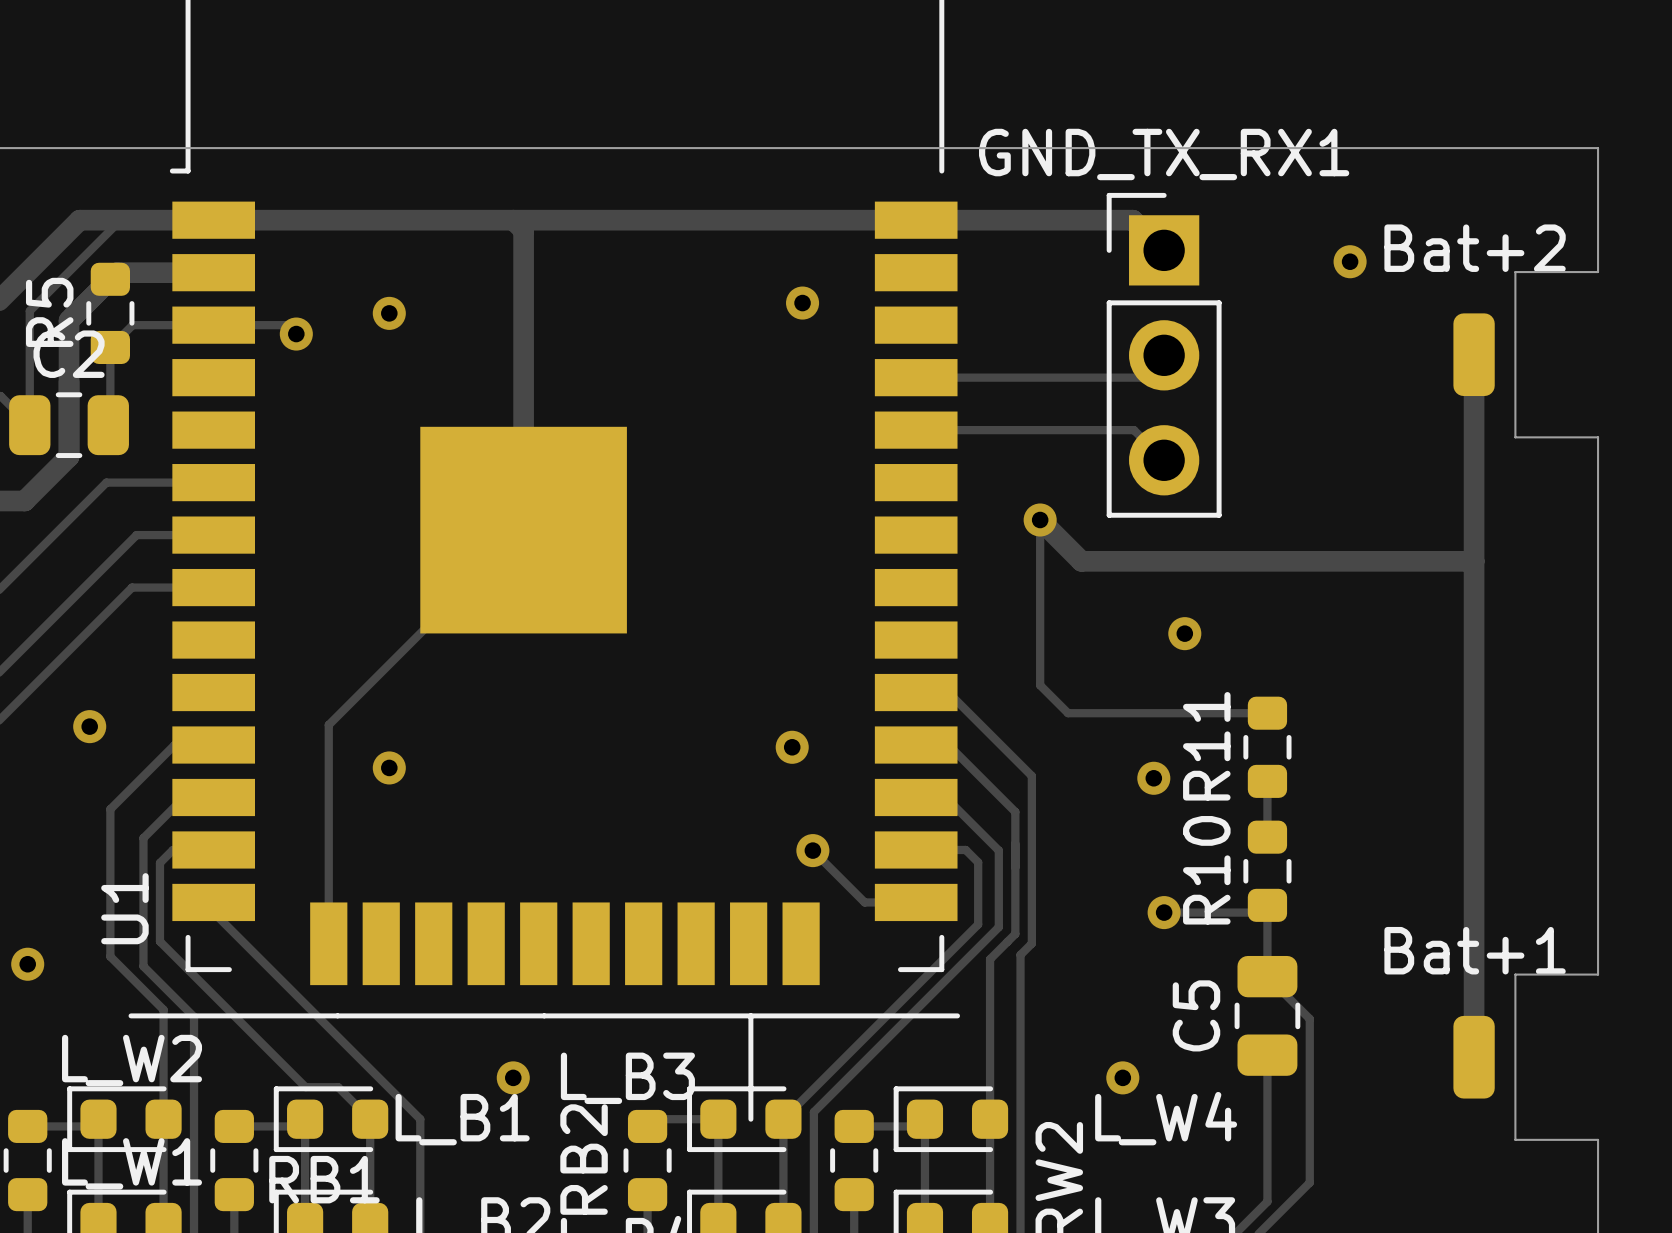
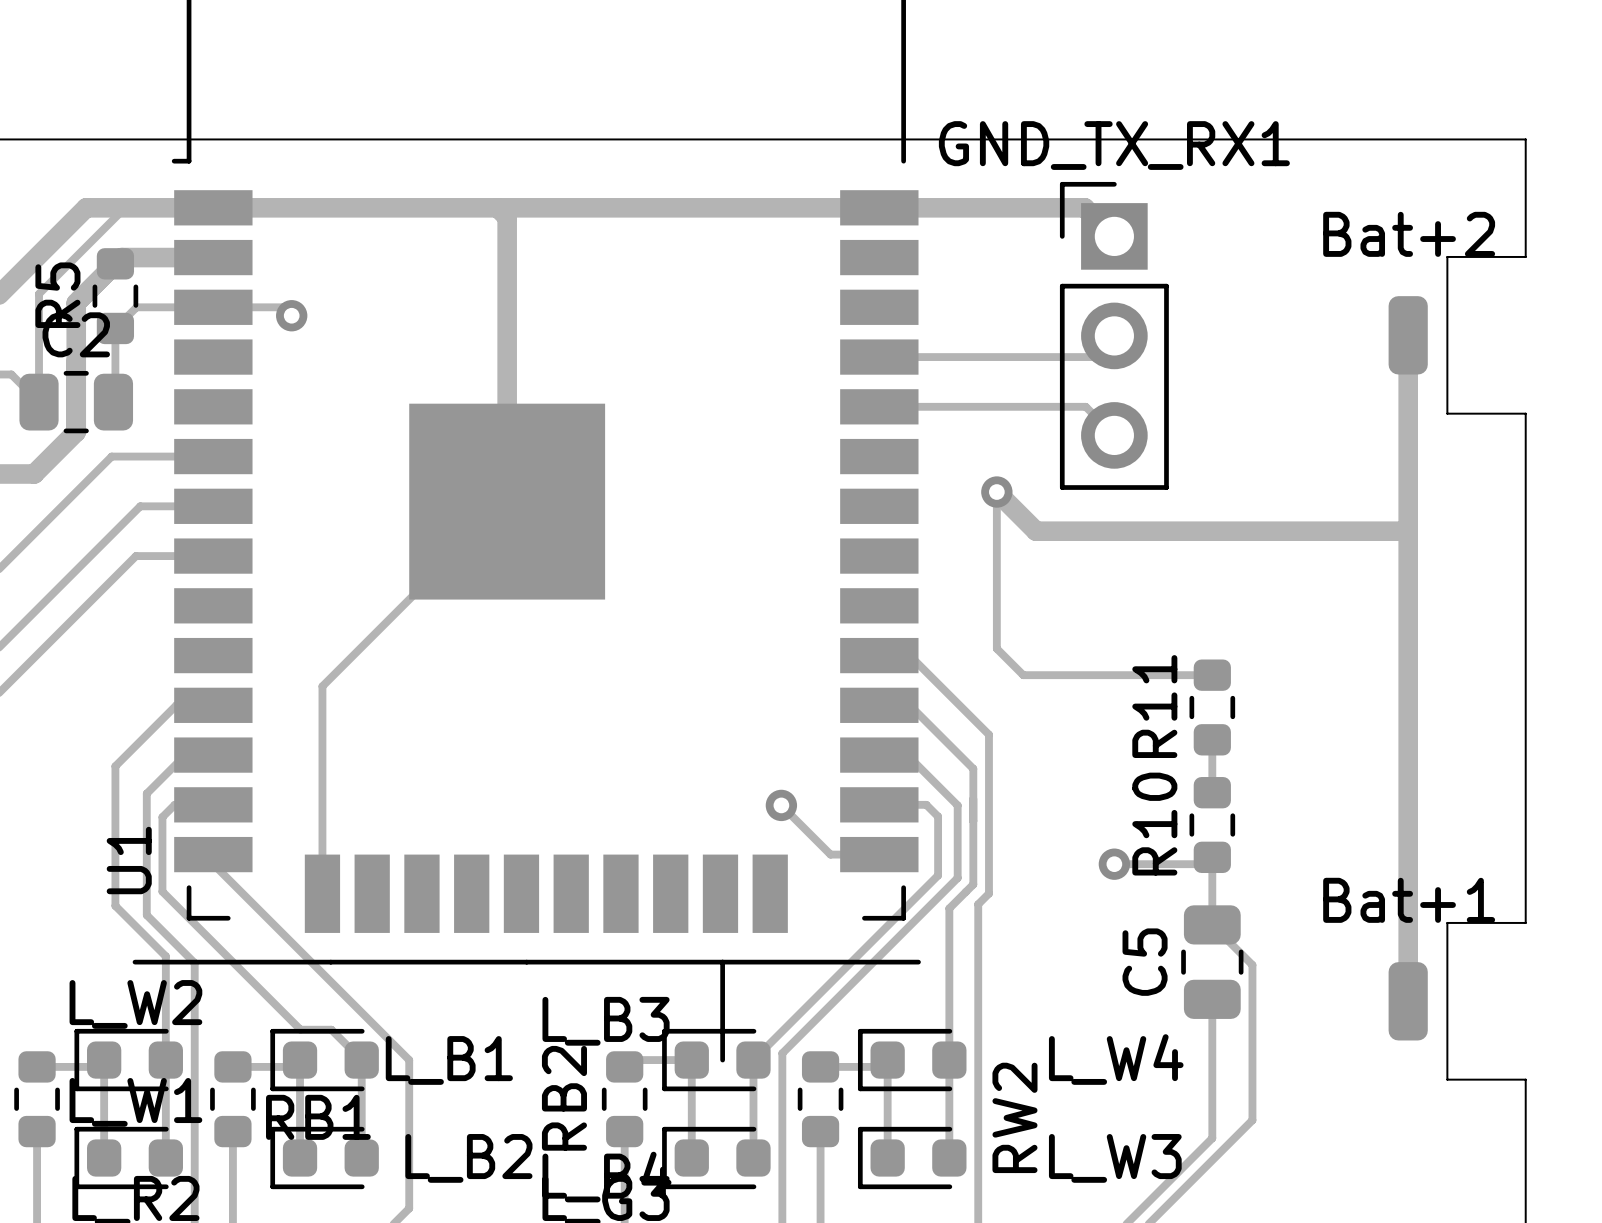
via: (1350, 261) -> none
via: (802, 303) -> none
via: (389, 313) -> none
via: (1184, 633) -> none
via: (89, 726) -> none
via: (792, 747) -> none
via: (389, 767) -> none
via: (1153, 778) -> none
via: (27, 964) -> none
via: (513, 1077) -> none
via: (1122, 1077) -> none

